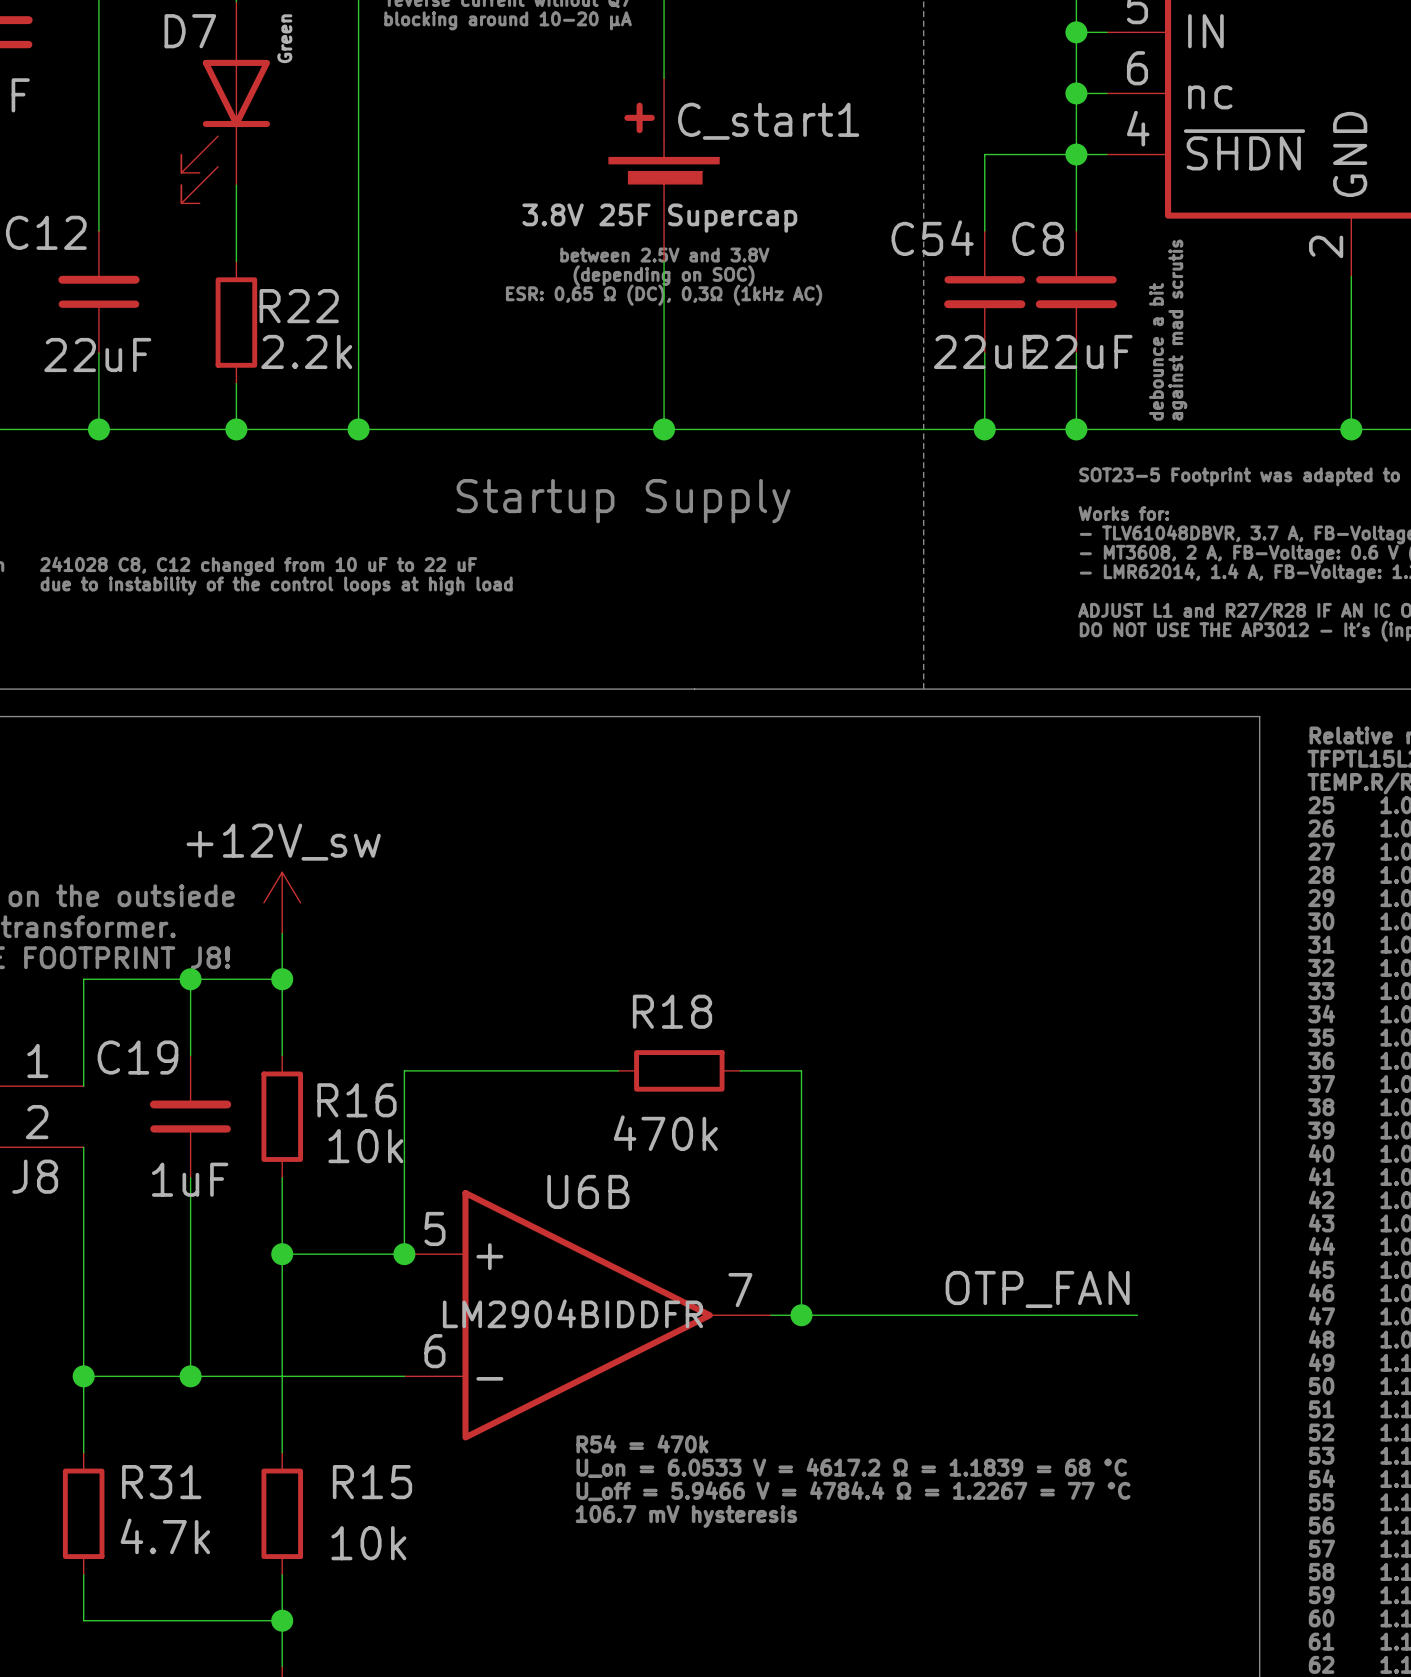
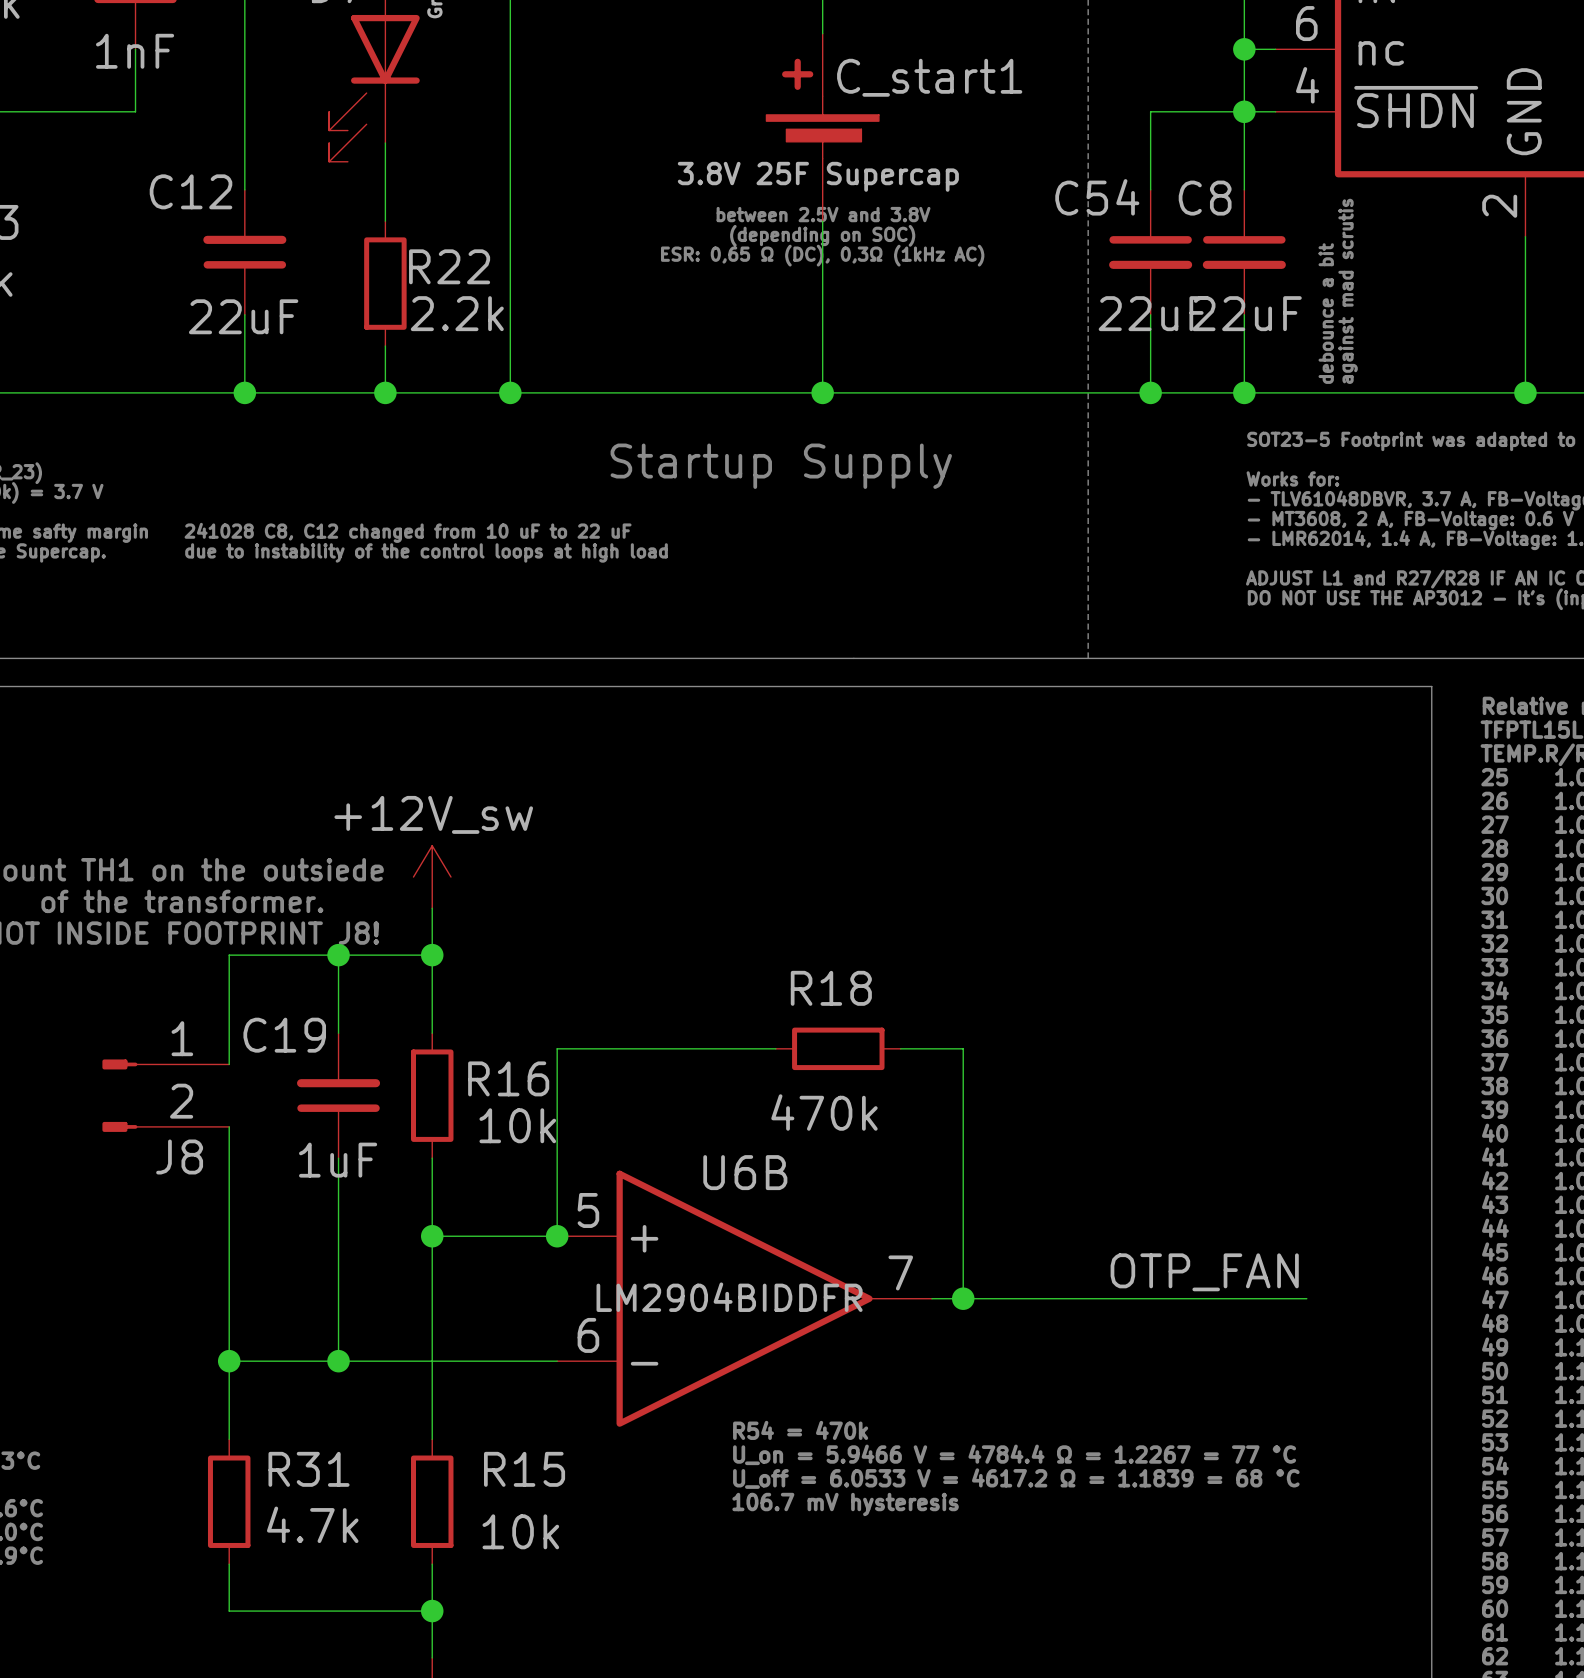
text: U_on = 6.0533 V = 4617.2 Ω = 1.1839 = 68 °C (851, 1467) -> U_on = 5.9466 V = 4784.4 Ω = 1.2267 = 77 °C (1014, 1454)
text: U_off = 5.9466 V = 4784.4 Ω = 1.2267 = 77 °C (853, 1491) -> U_off = 6.0533 V = 4617.2 Ω = 1.1839 = 68 °C (1016, 1478)

